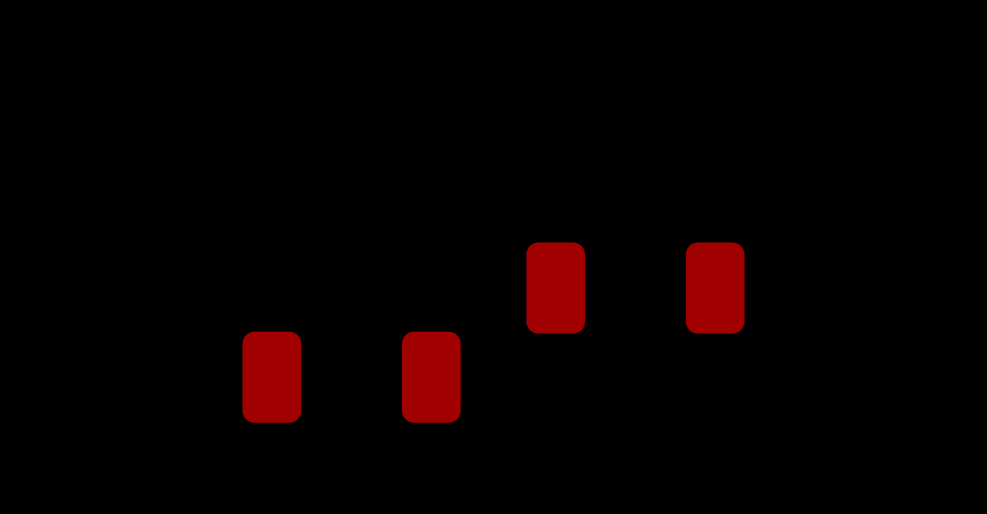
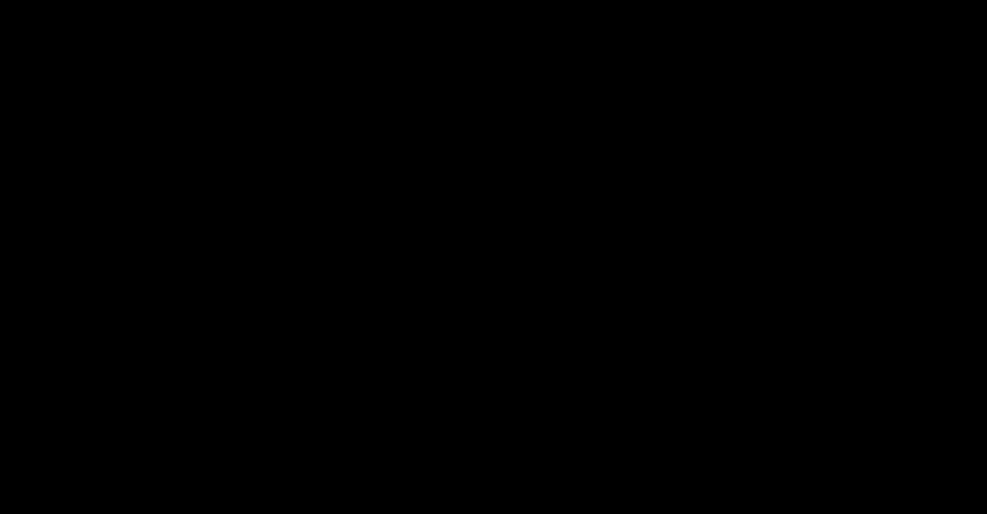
part: (635, 288) -> none
part: (351, 377) -> none

